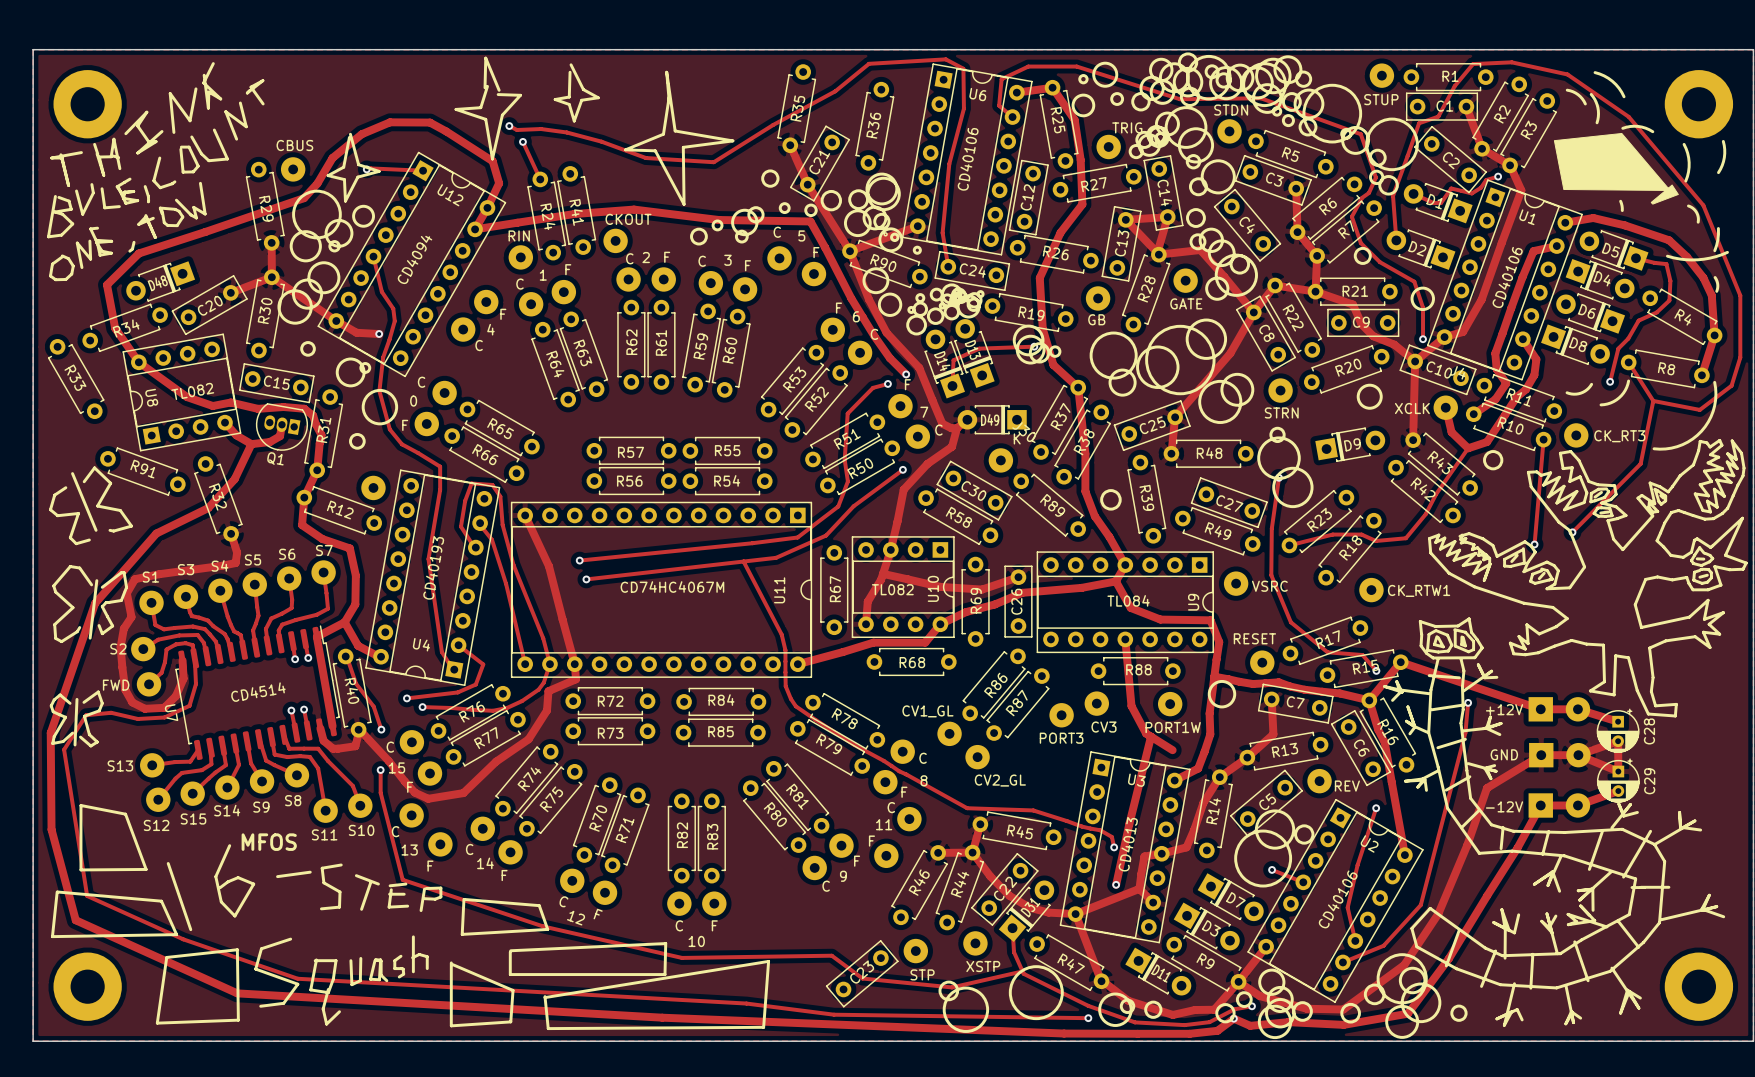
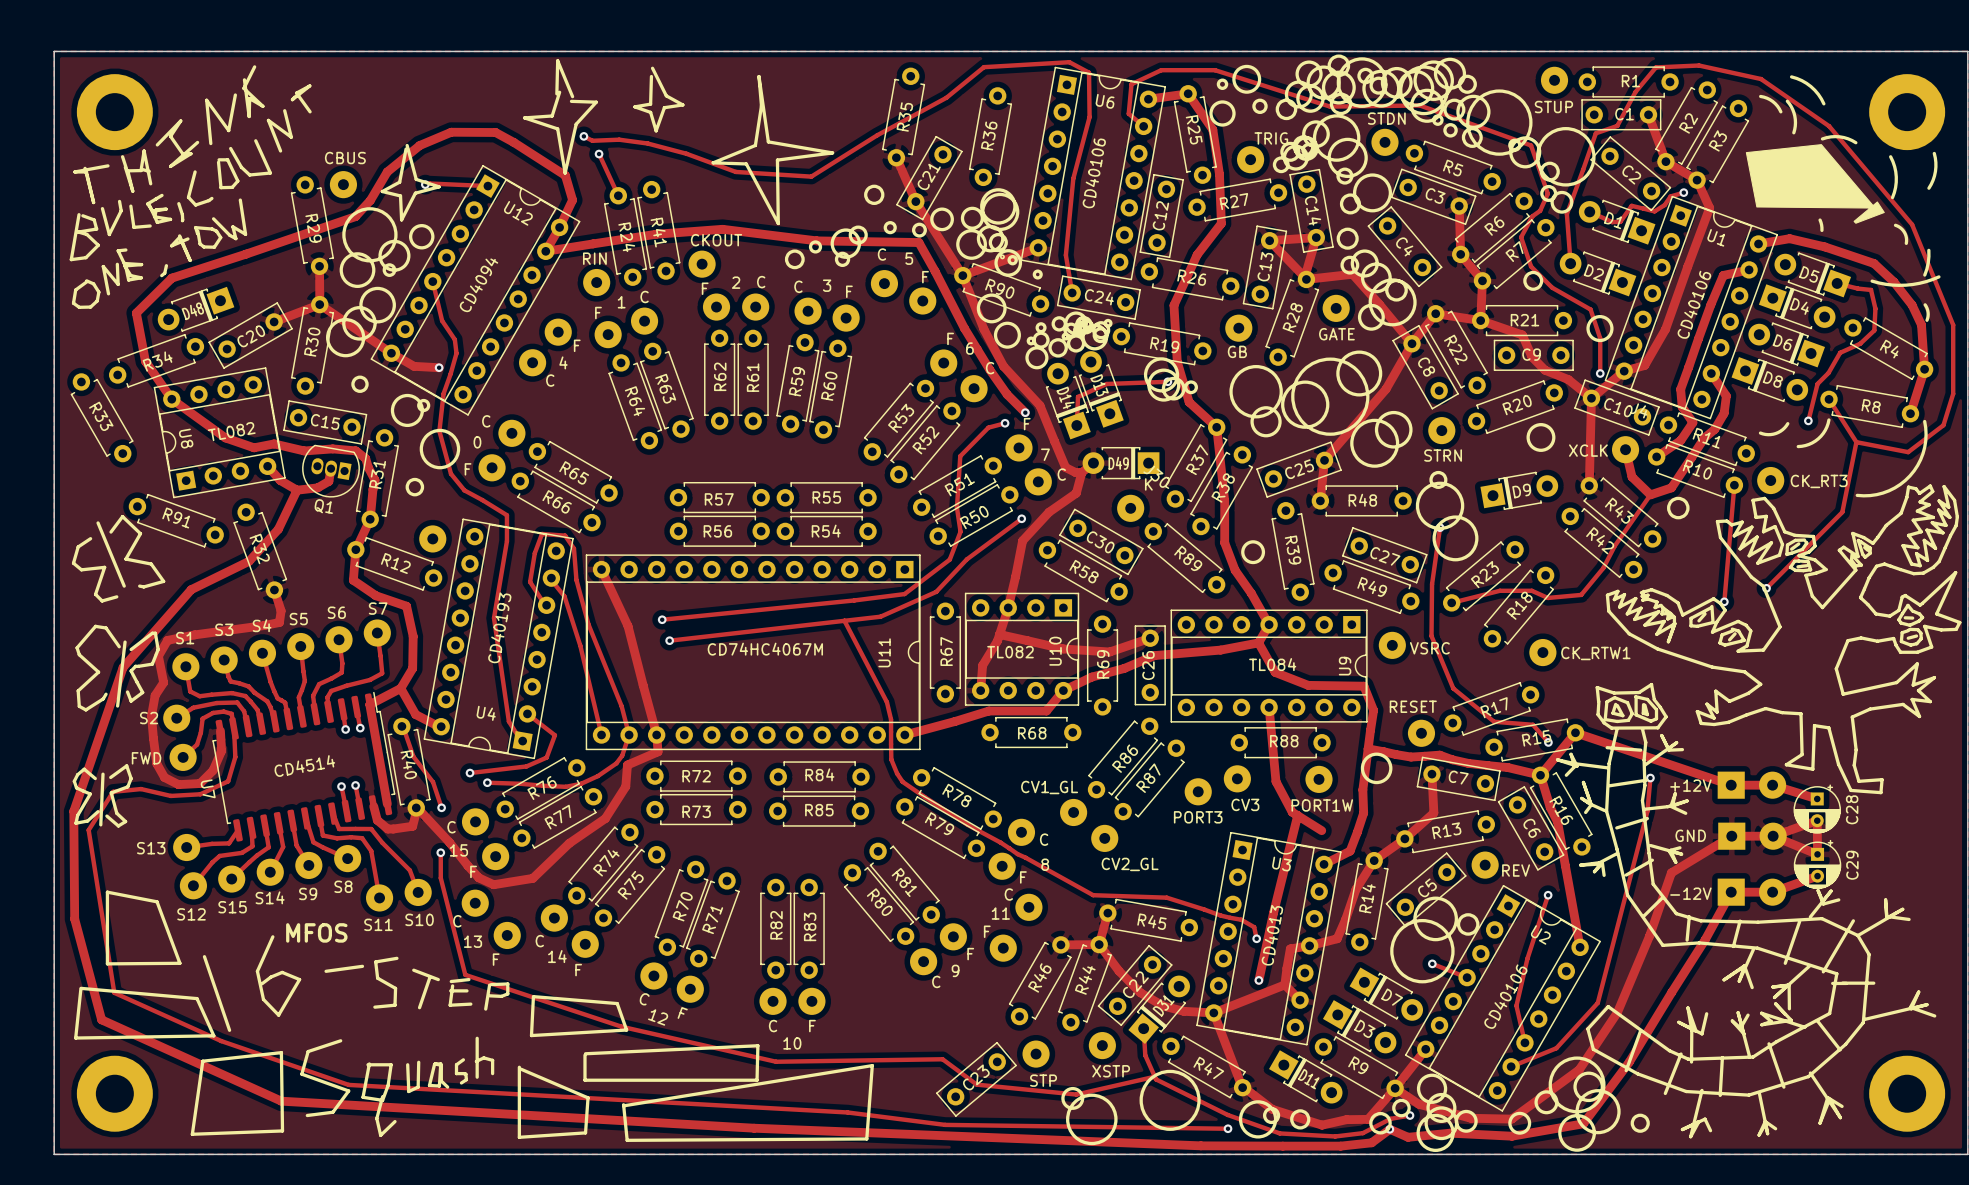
text: F (667, 257) -> C (761, 282)
text: C (629, 258) -> none
text: none -> F (705, 288)
text: F (568, 269) -> C (644, 297)
text: C (519, 284) -> F (598, 312)

